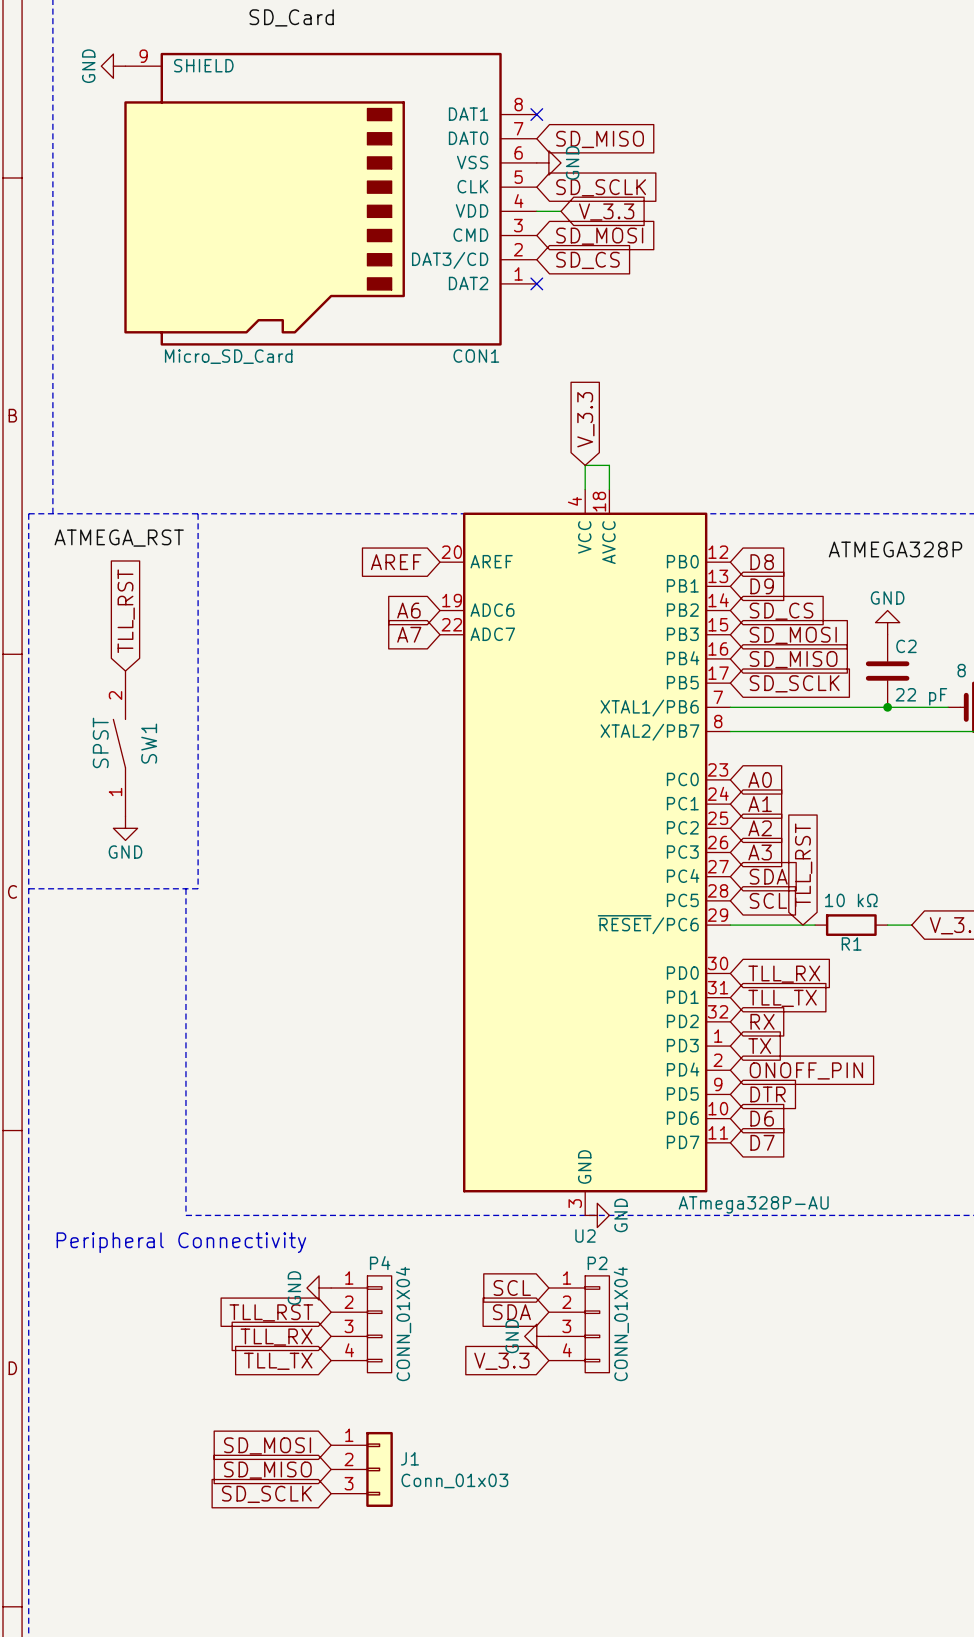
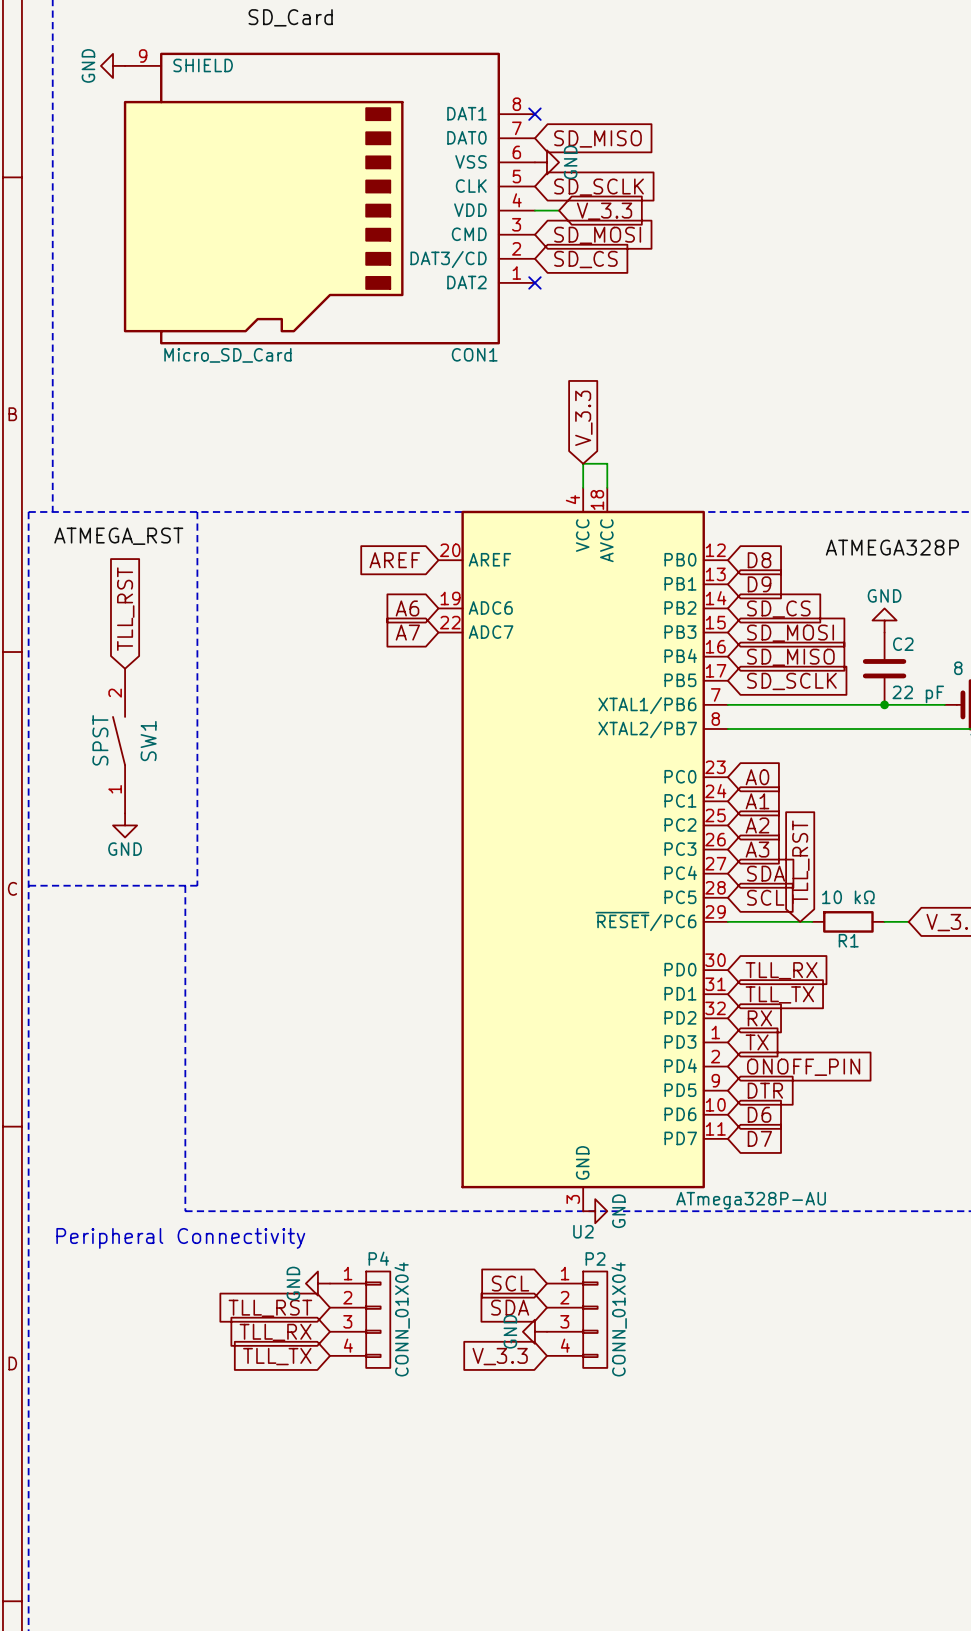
global label: SD_MOSI (267, 1445) -> none
J1: Conn_01x03 (362, 1469) -> none
global label: SD_MISO (267, 1470) -> none
global label: SD_SCLK (266, 1494) -> none

